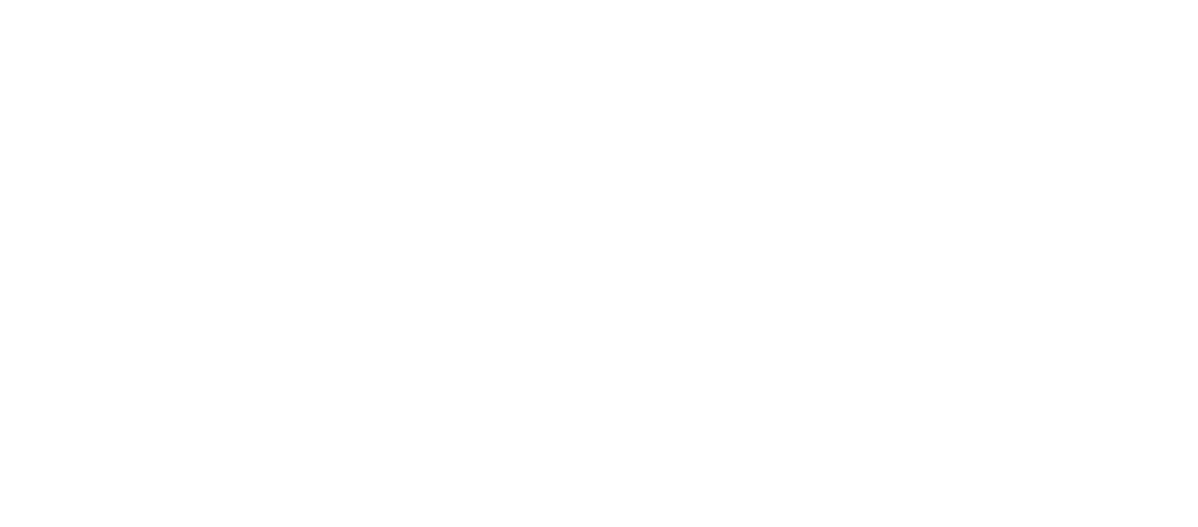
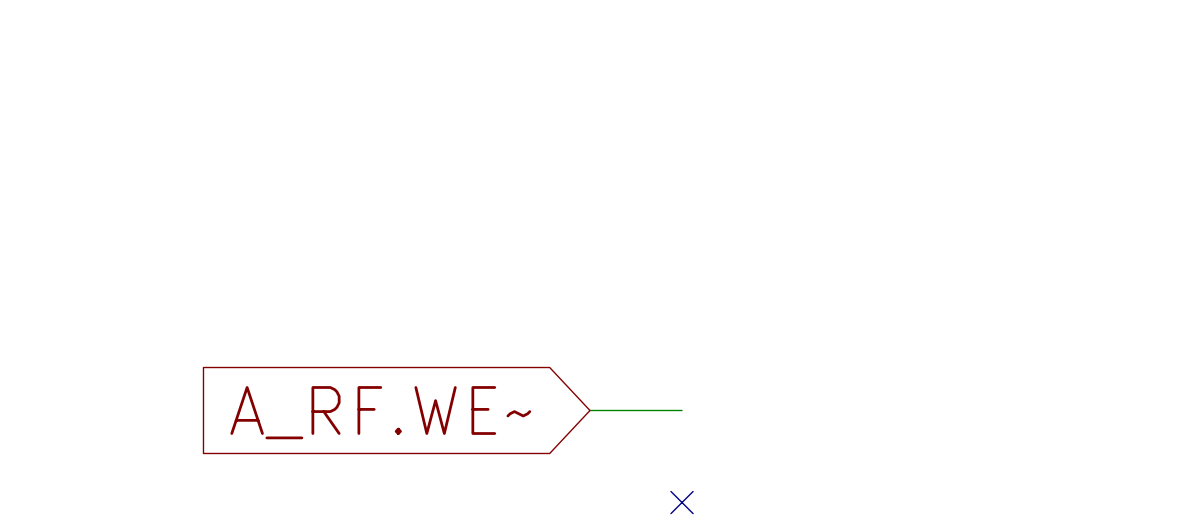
wire: none -> (589, 410) (682, 410)
global label: none -> A_RF.WE~ (380, 412)
no-connect mark: none -> (682, 502)

